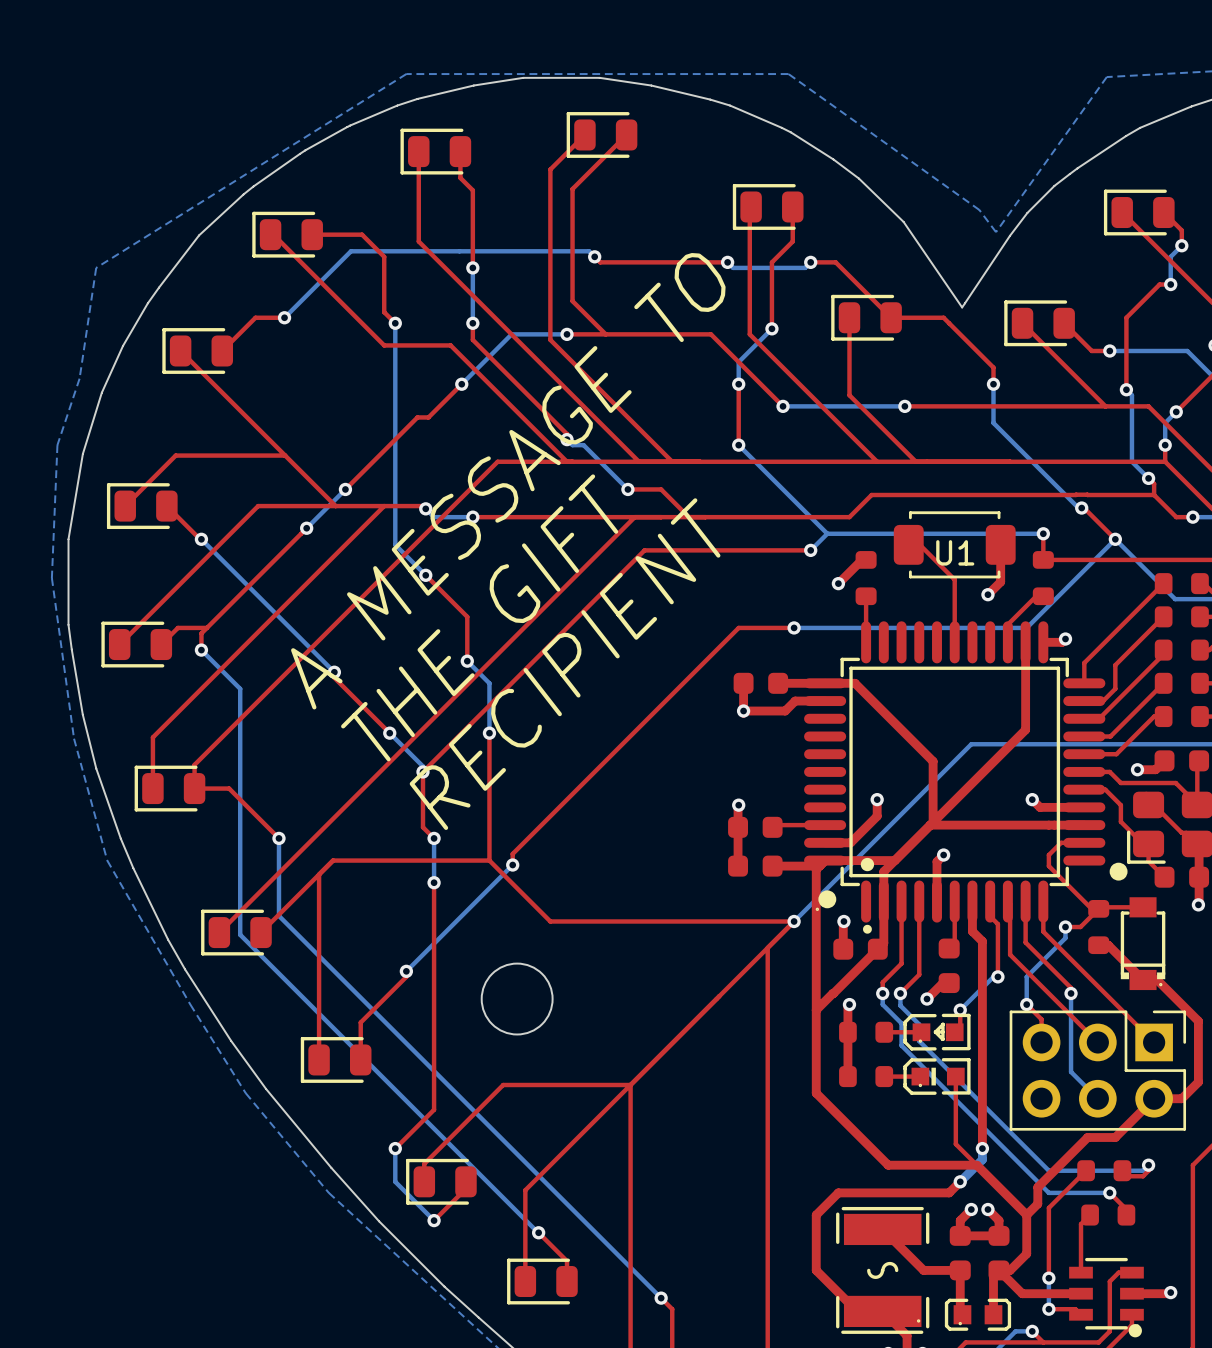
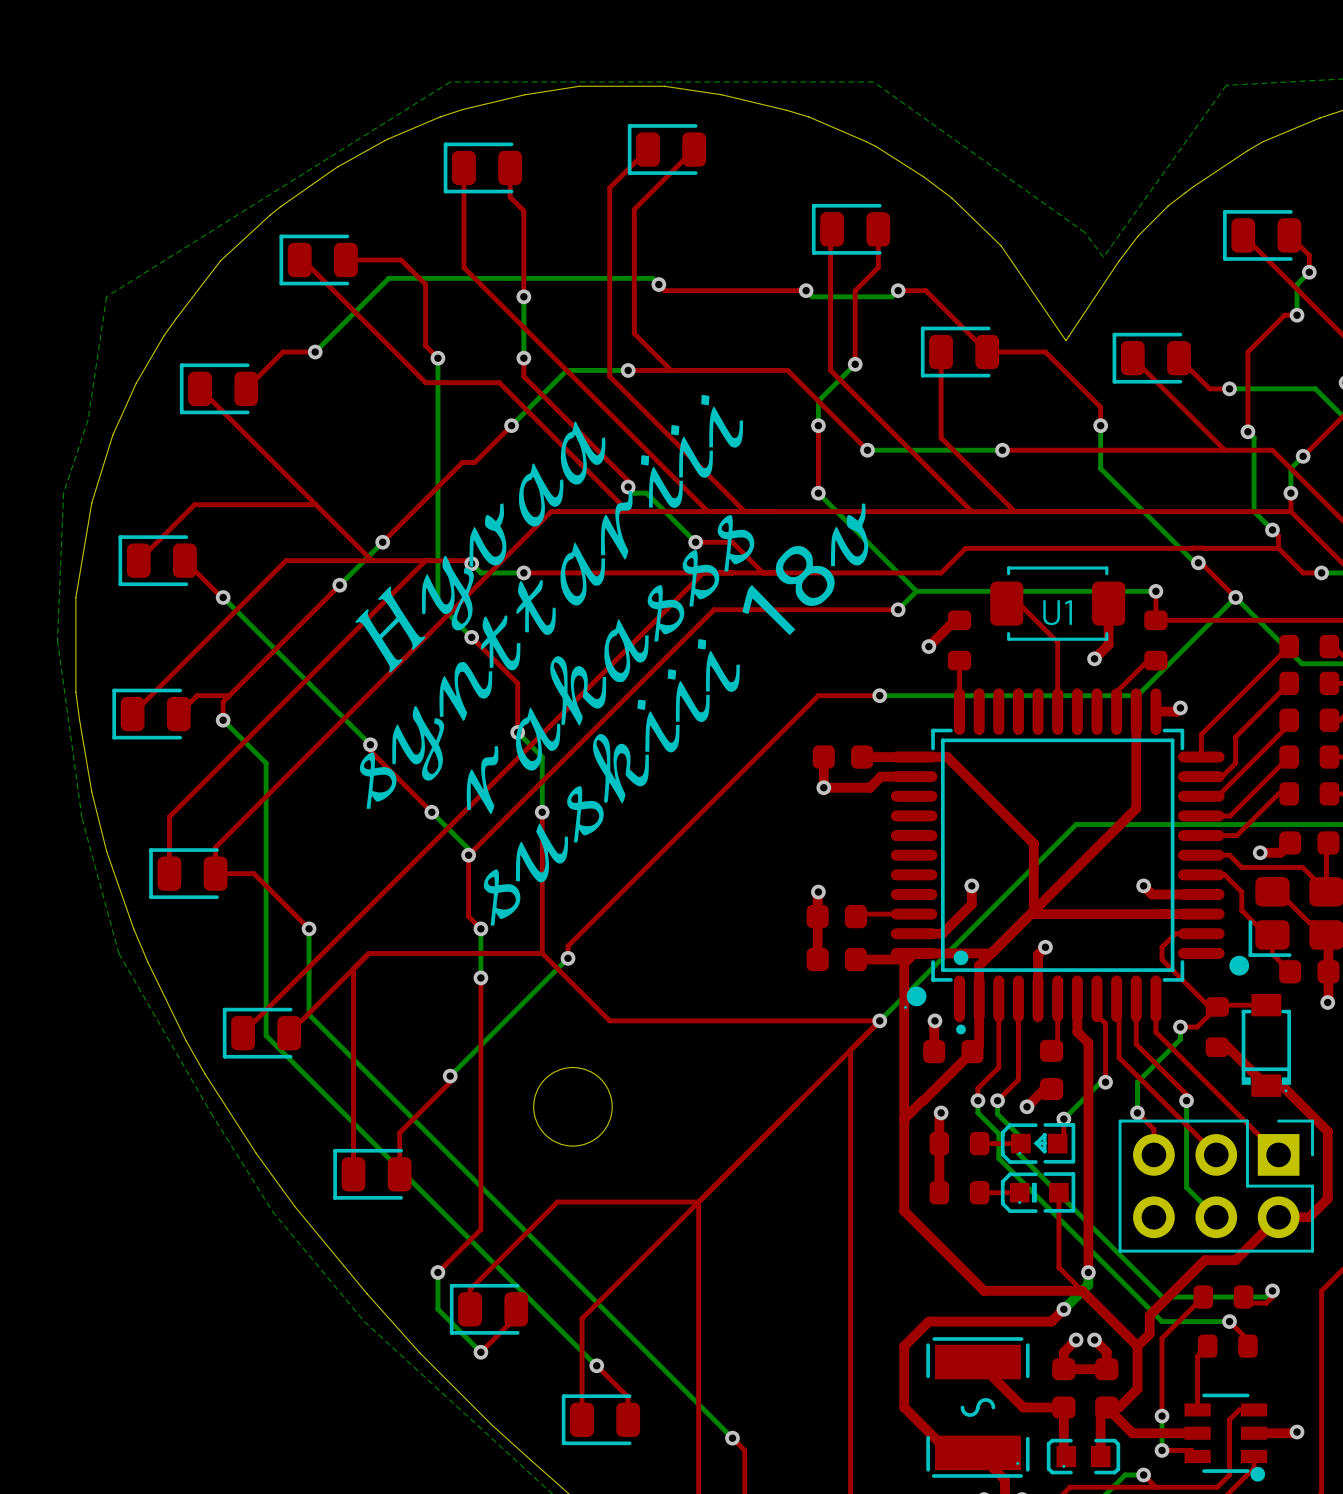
drawing: none -> [355, 394, 869, 926]
text: A MESSAGE TO (508, 481) -> none
text: THE GIFT (479, 617) -> none
text: RECIPIENT (565, 664) -> none

